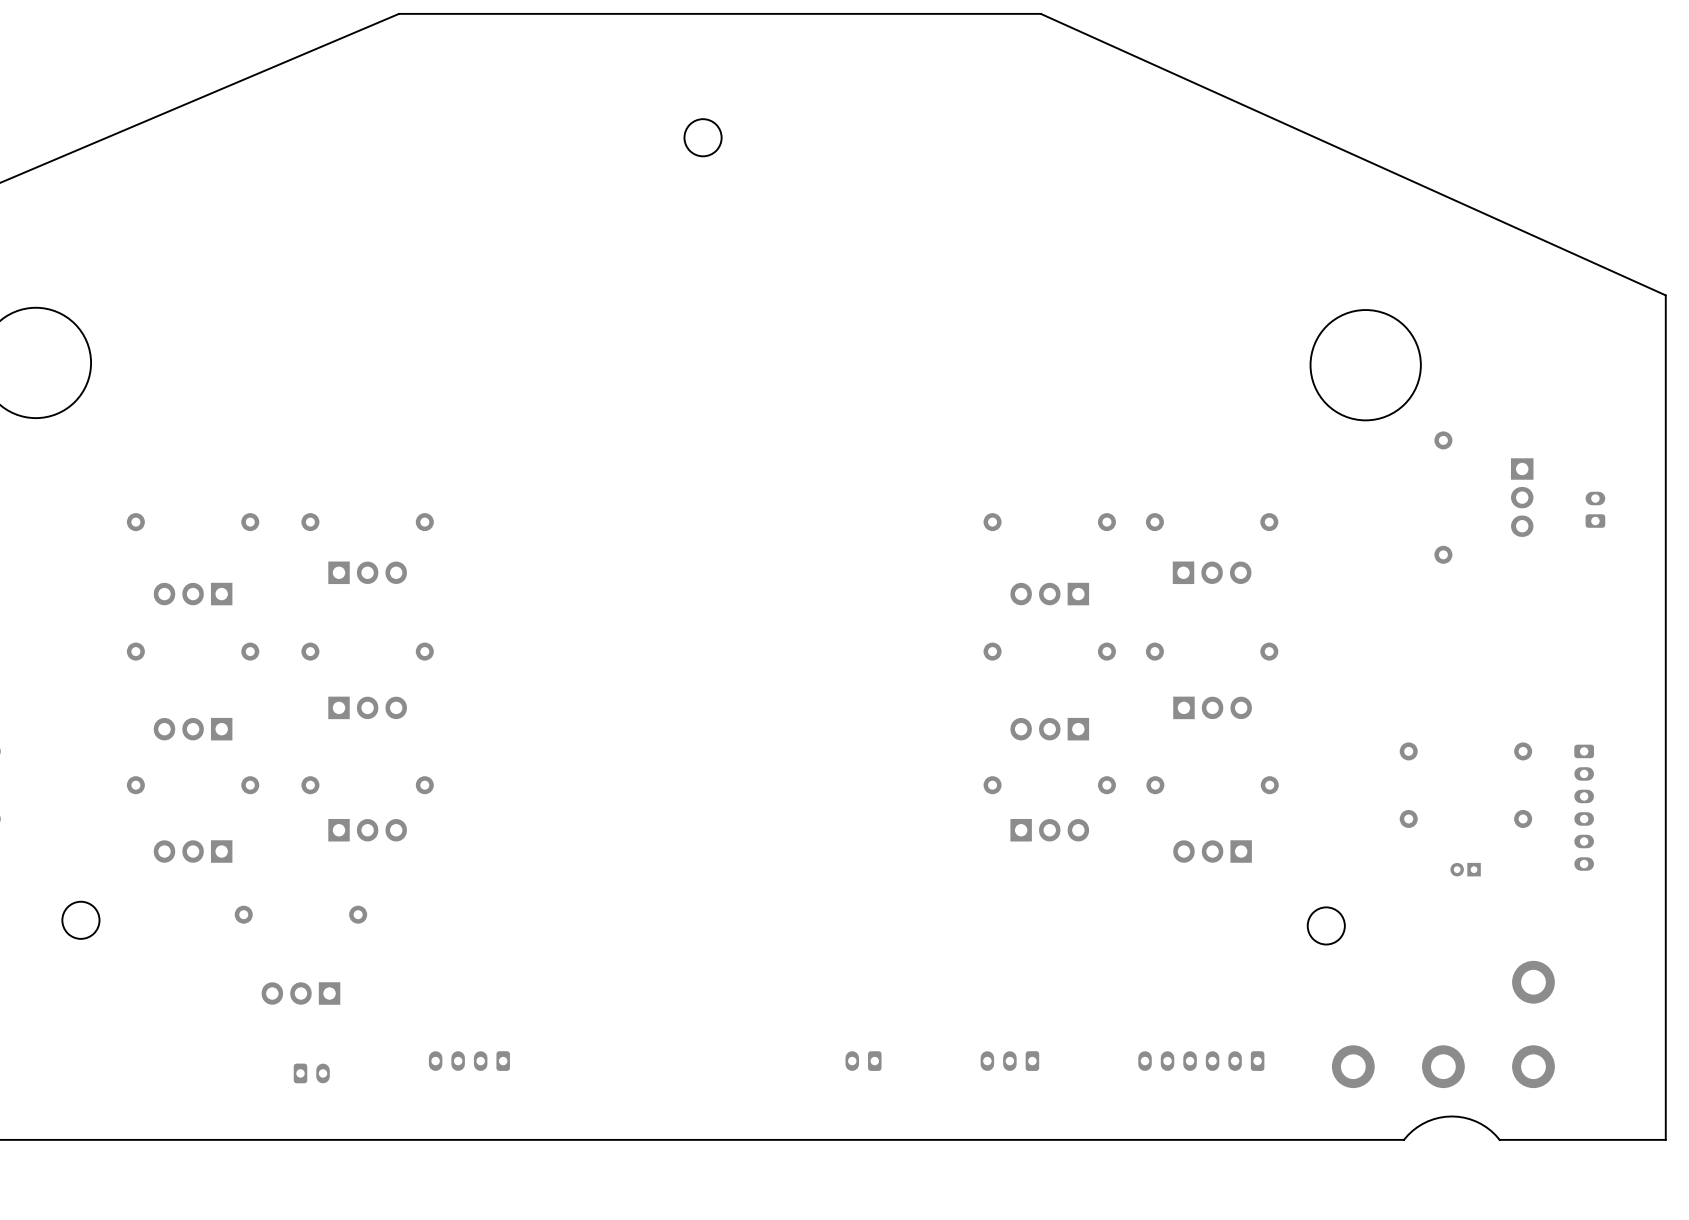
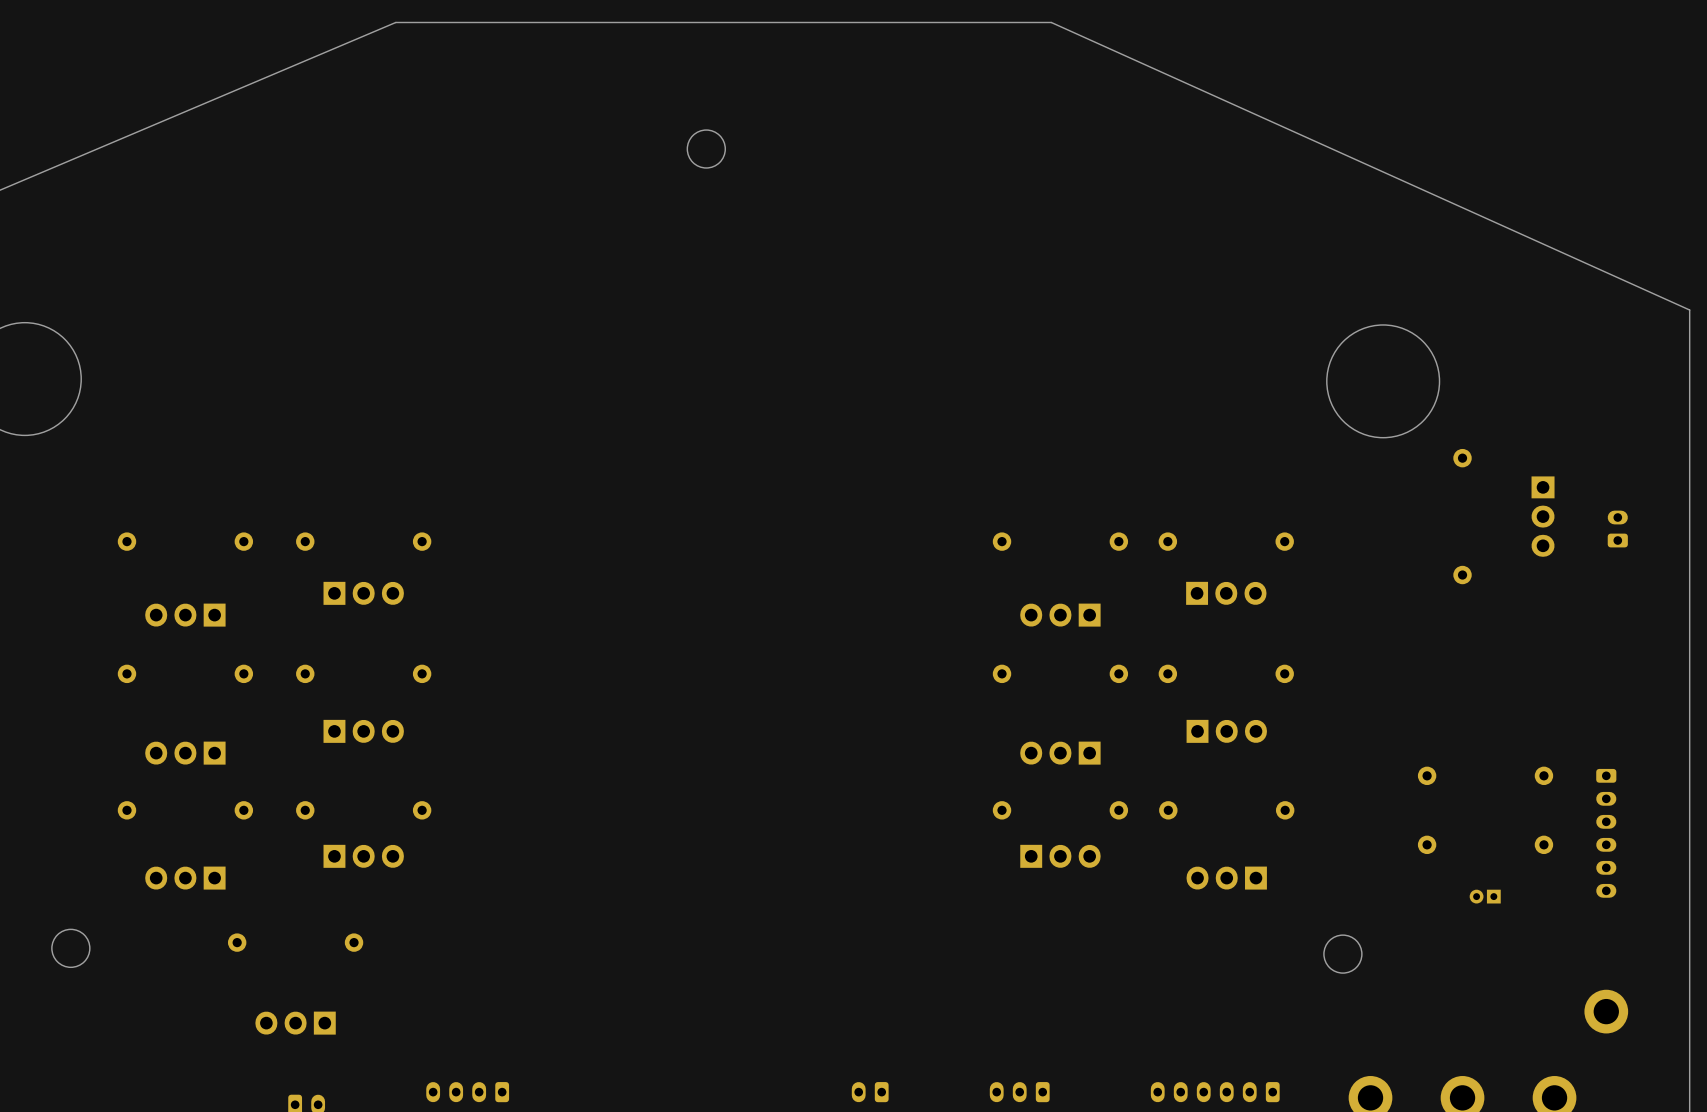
part position: (1533, 982) -> (1606, 1011)

